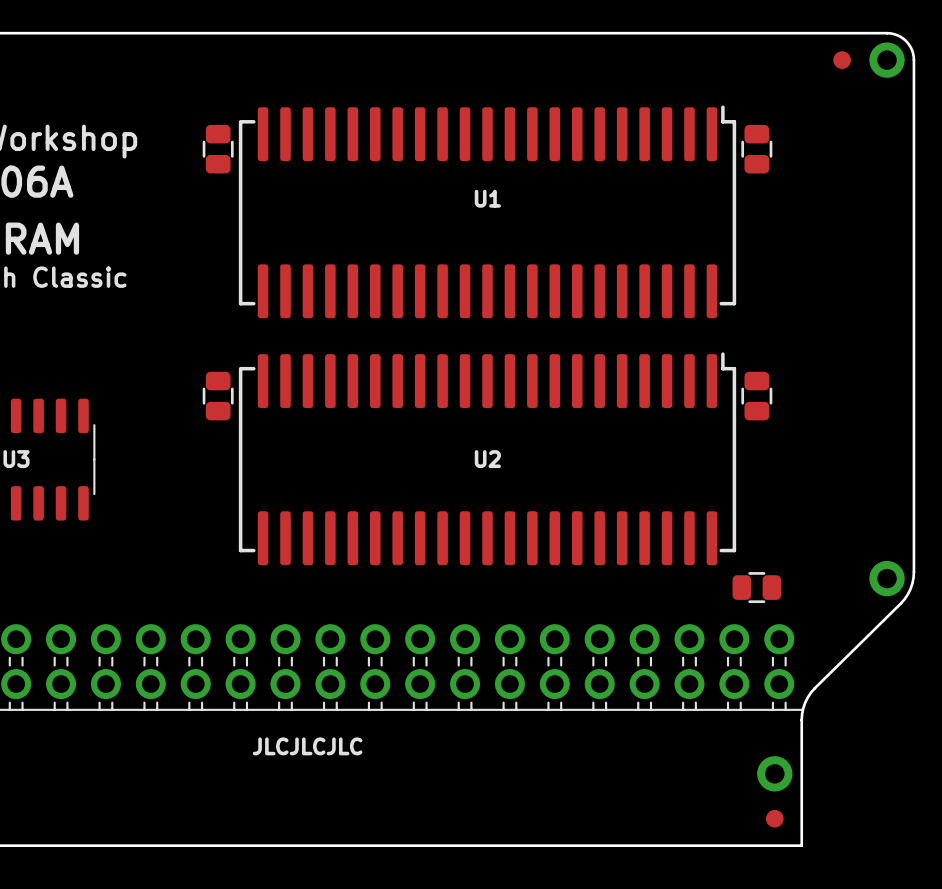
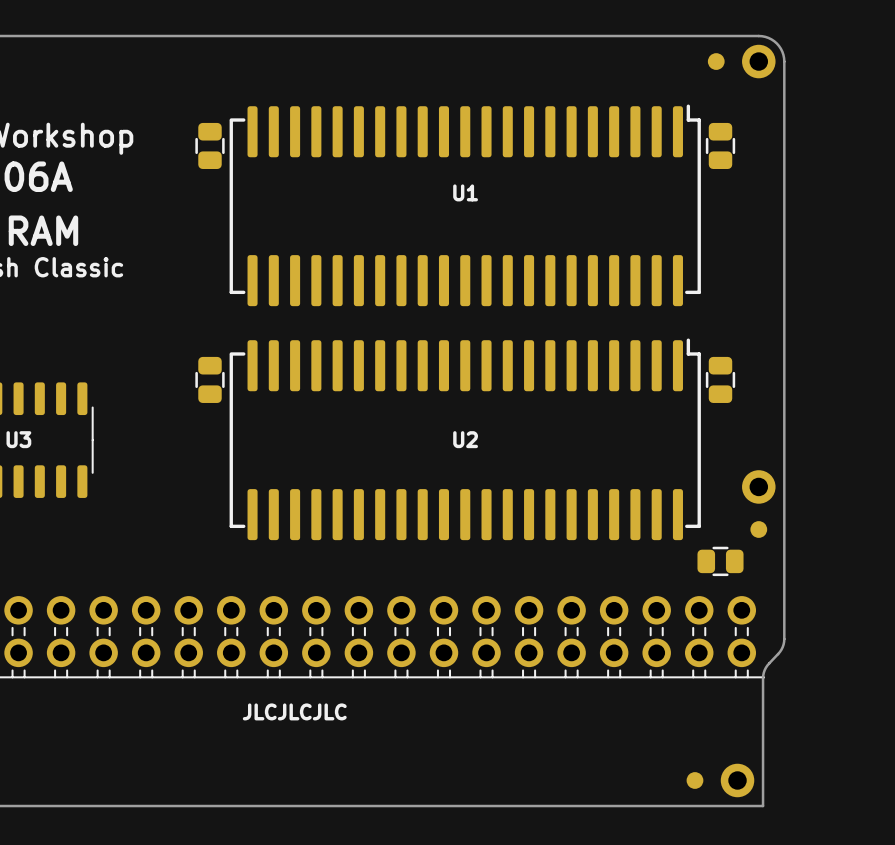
board edge: (797, 33) (893, 34) (908, 43) (913, 60) (913, 577) (907, 594) (900, 603) (811, 692) (803, 708) (801, 719) -> (758, 36) (768, 37) (776, 43) (782, 51) (784, 61) (784, 639) (781, 649) (764, 670) (763, 686)
part position: (842, 60) -> (716, 61)
part position: (887, 60) -> (758, 61)
part: none -> (758, 529)
part position: (887, 578) -> (758, 486)
part: (774, 773) -> none
part footprint: [765, 809, 784, 828] -> [720, 763, 755, 798]
part: none -> (694, 780)

